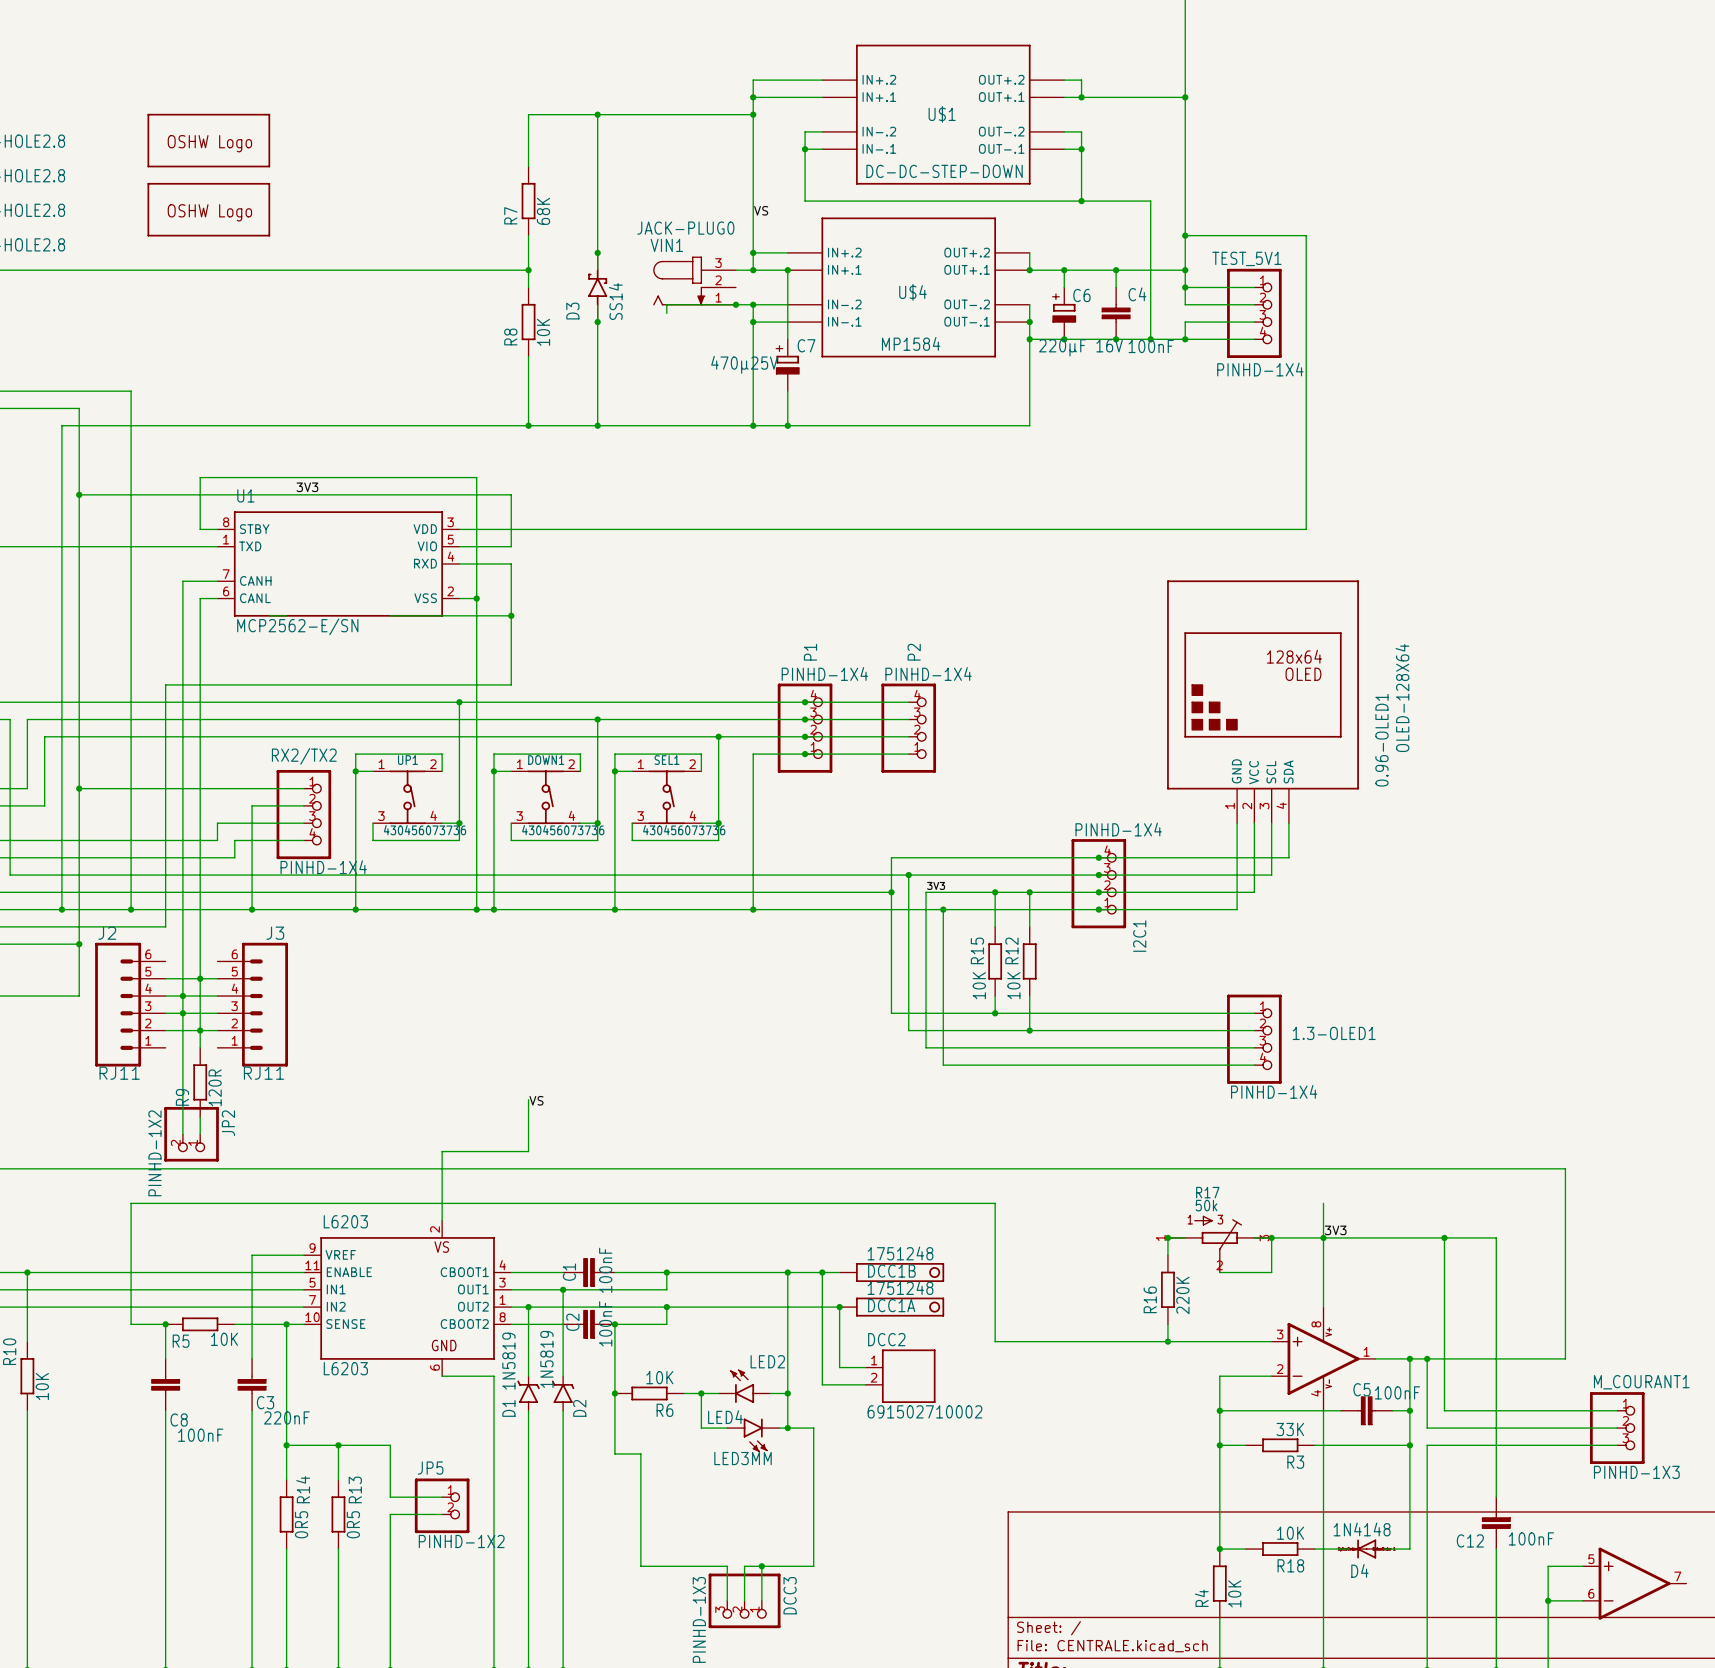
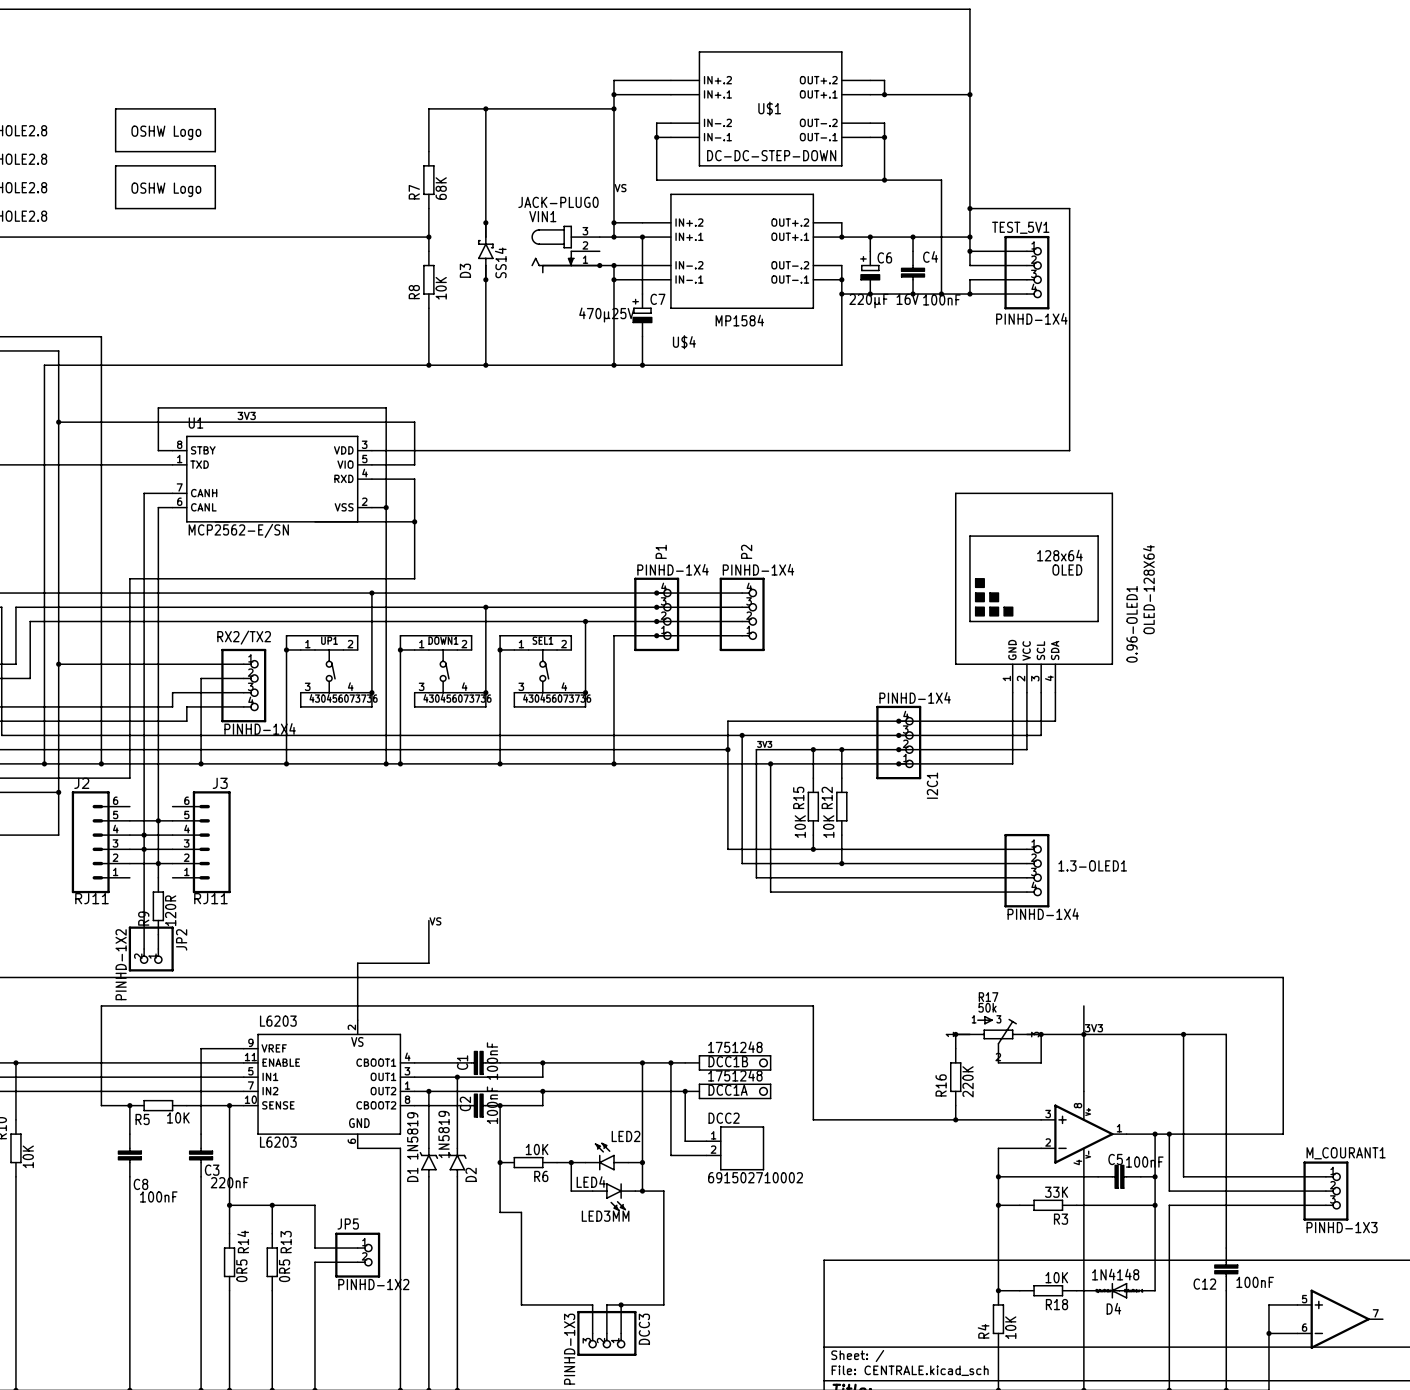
U$4 name position: U$4 (913, 292) -> U$4 (684, 342)
U$4 value position: MP1584 (911, 343) -> MP1584 (739, 320)

